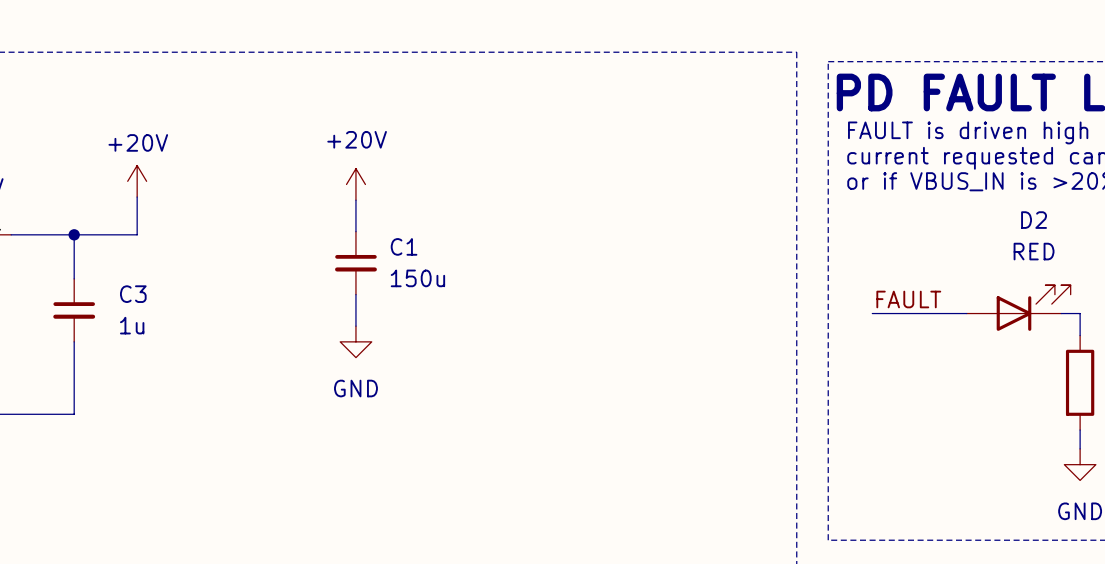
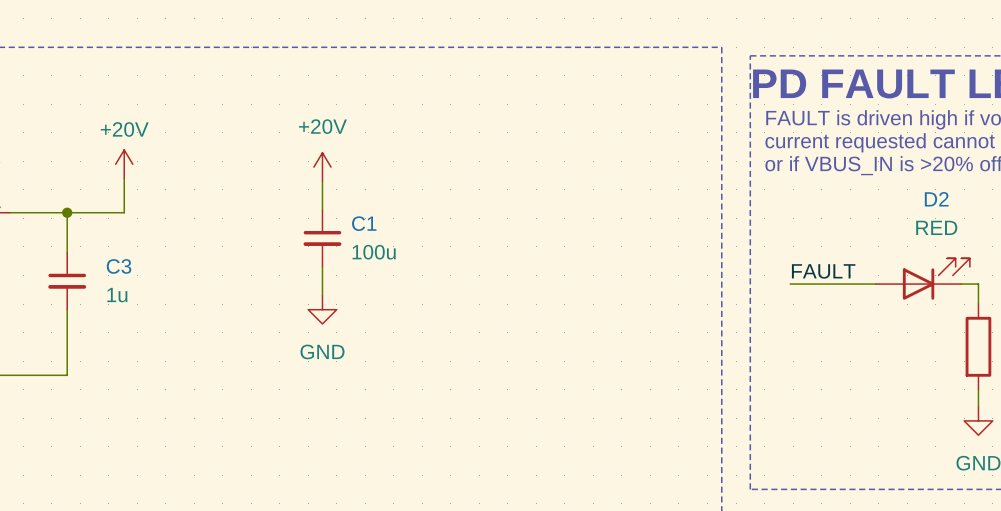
C1 value: 150u (417, 278) -> 100u (374, 252)

